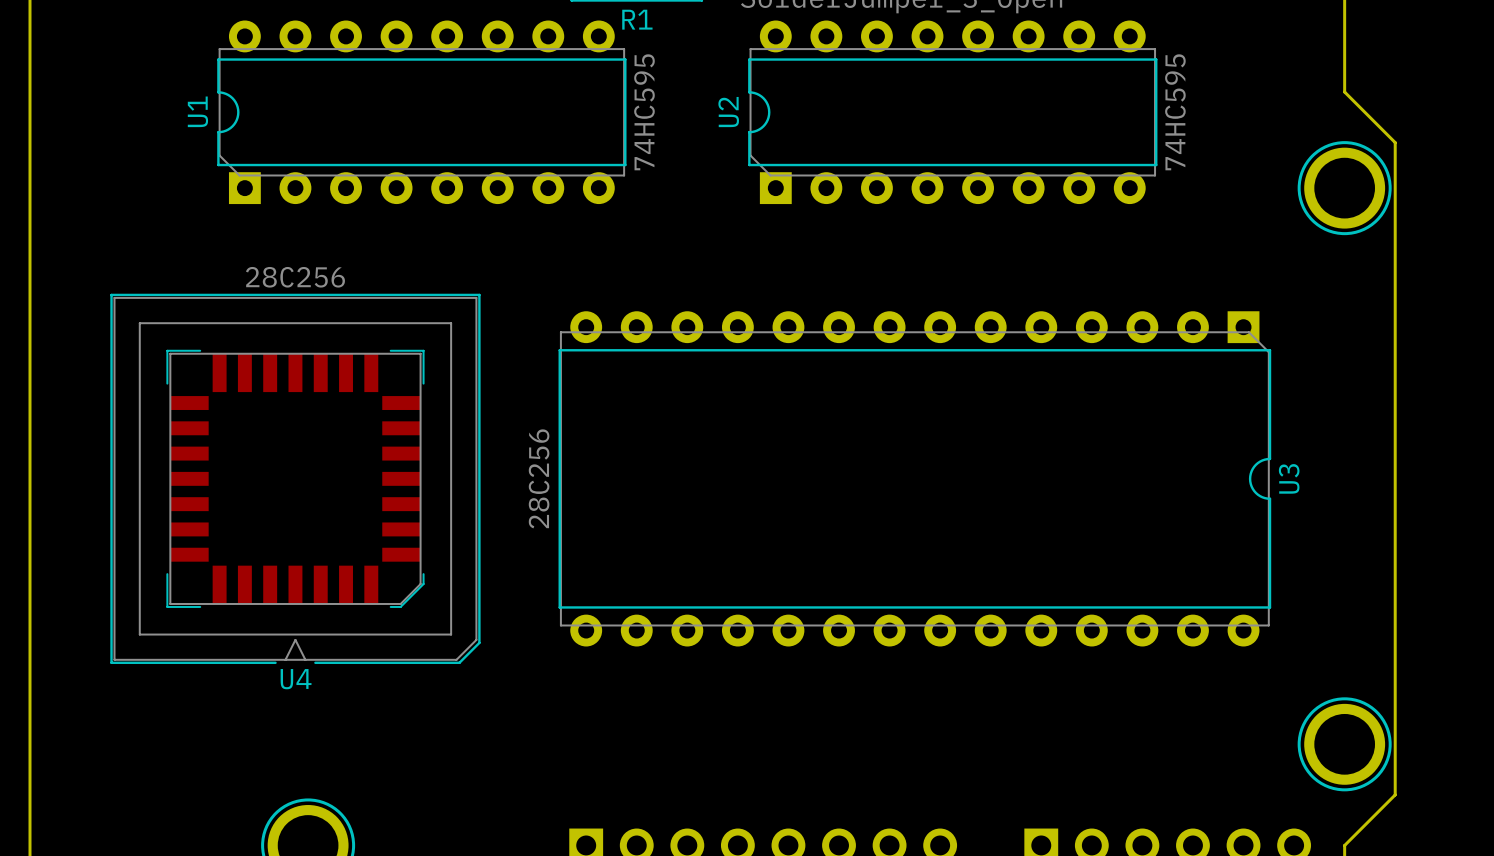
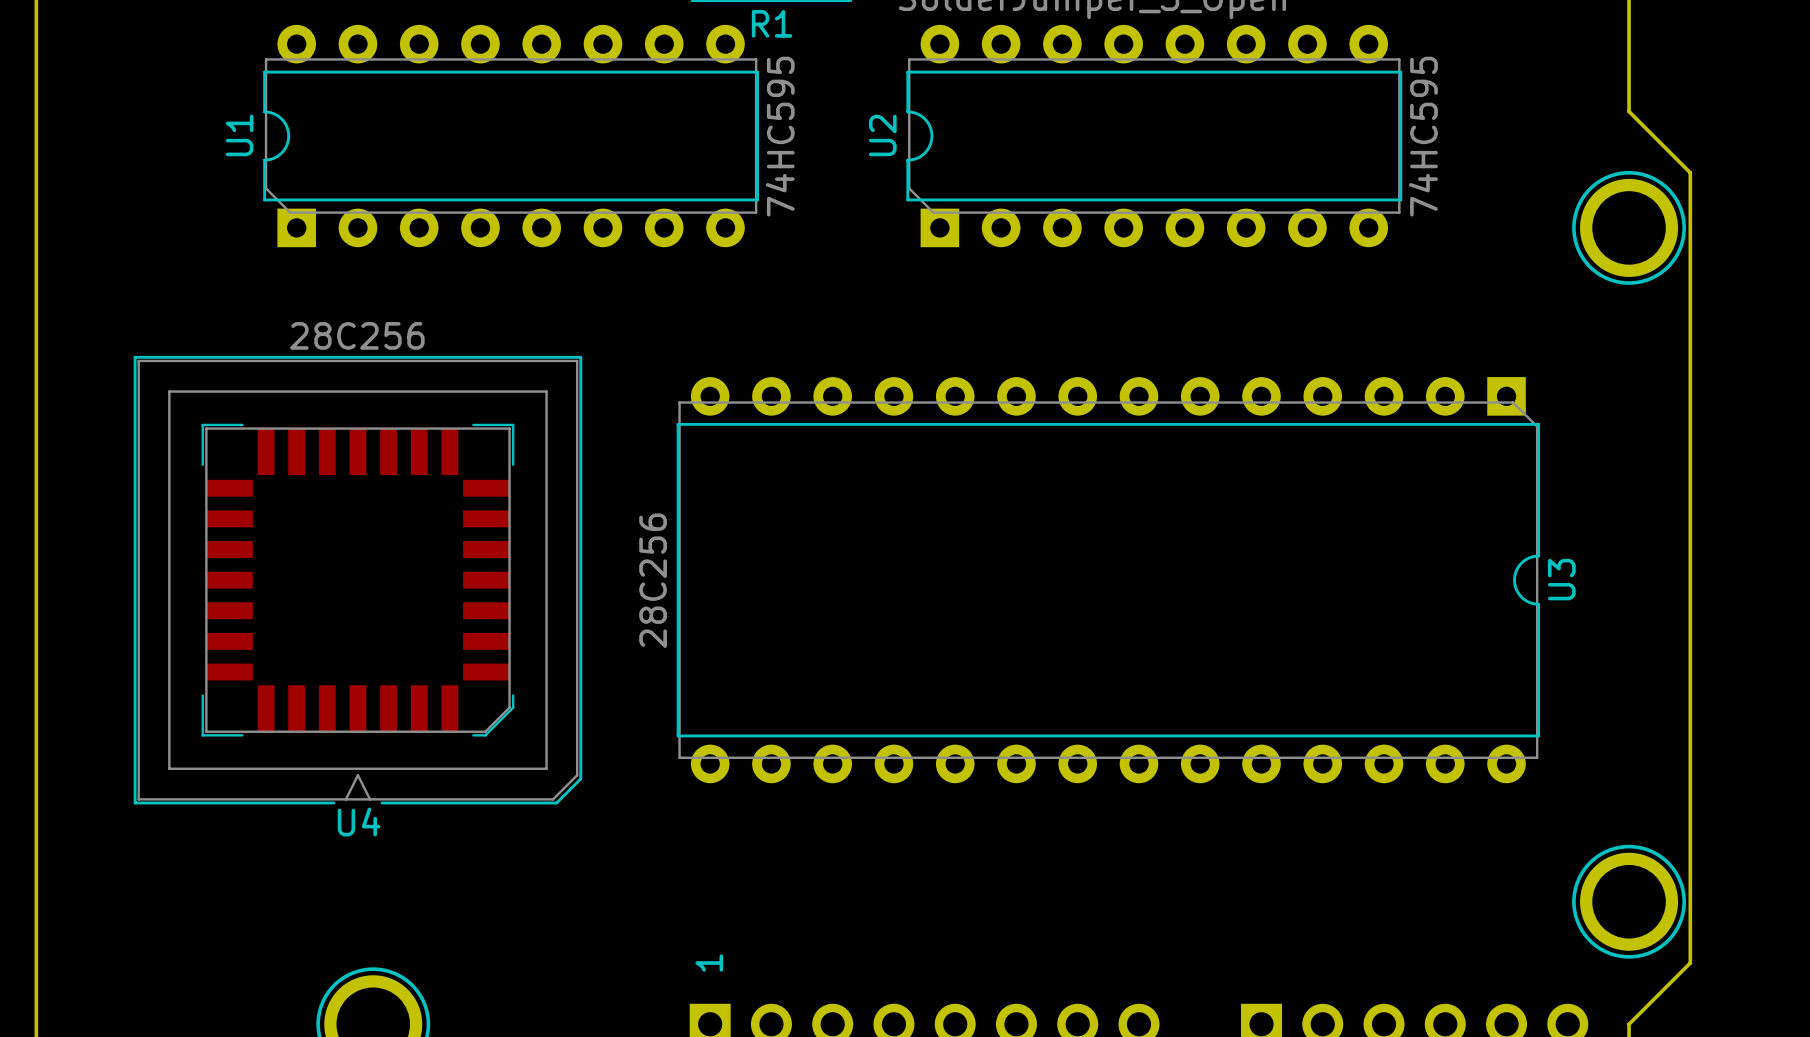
text: none -> 1 (709, 963)

